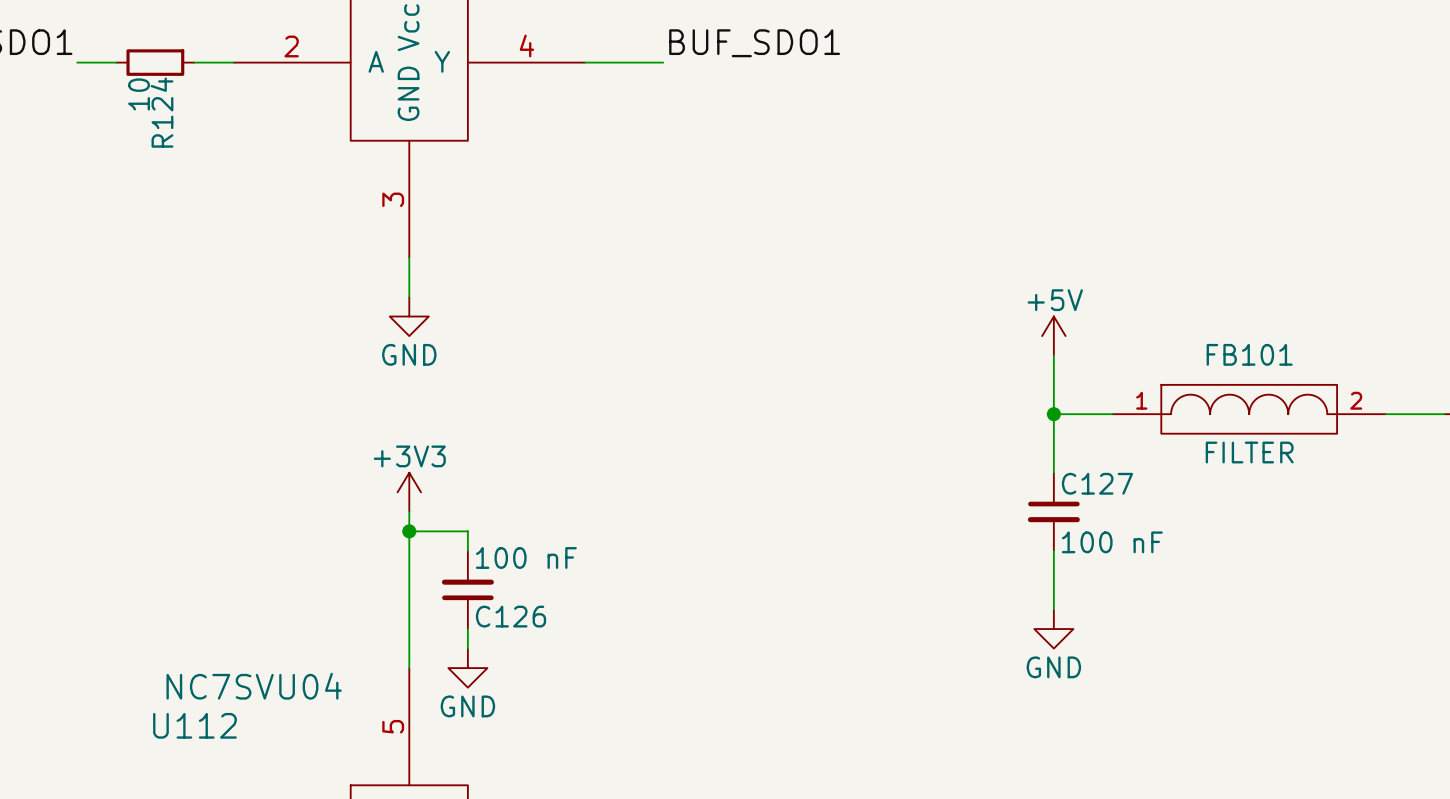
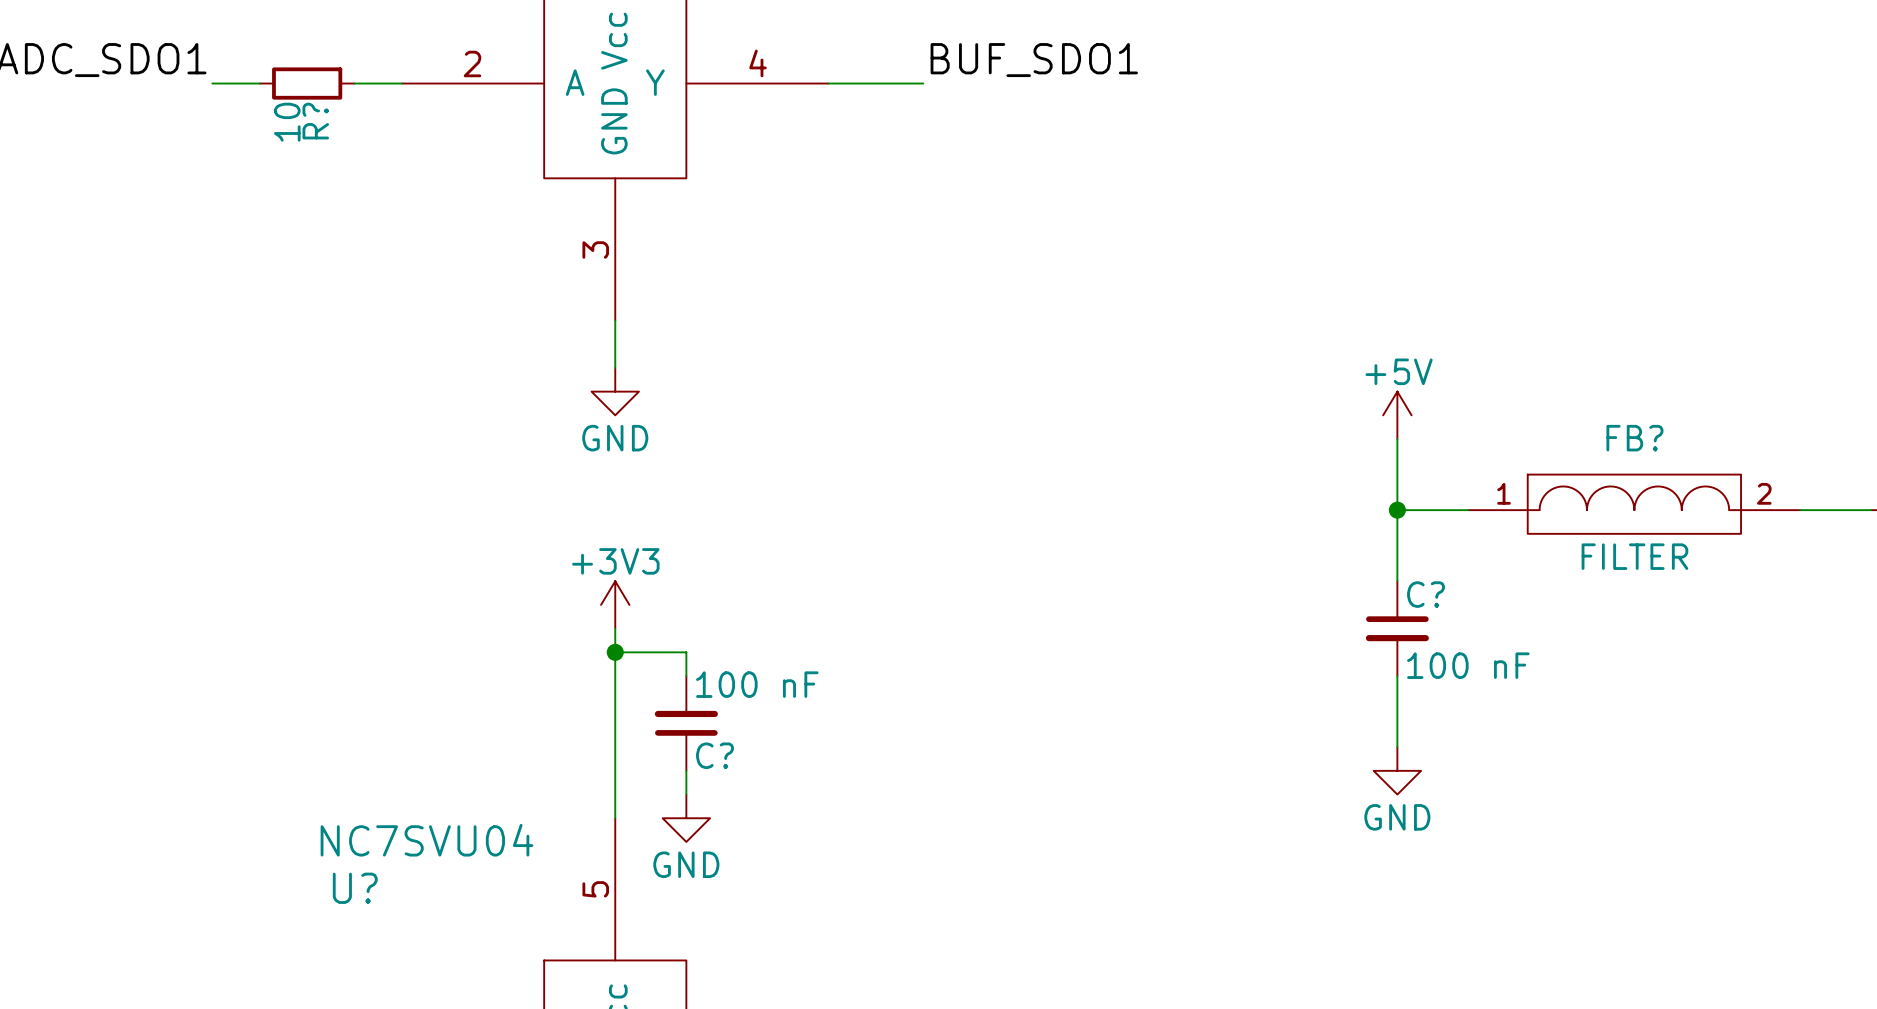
R124 name: R124 (161, 112) -> R? (315, 121)
FB101 name: FB101 (1249, 354) -> FB? (1634, 438)
C127 name: C127 (1097, 483) -> C? (1426, 594)
C126 name: C126 (511, 616) -> C? (714, 755)
U112 name: U112 (195, 725) -> U? (355, 888)

